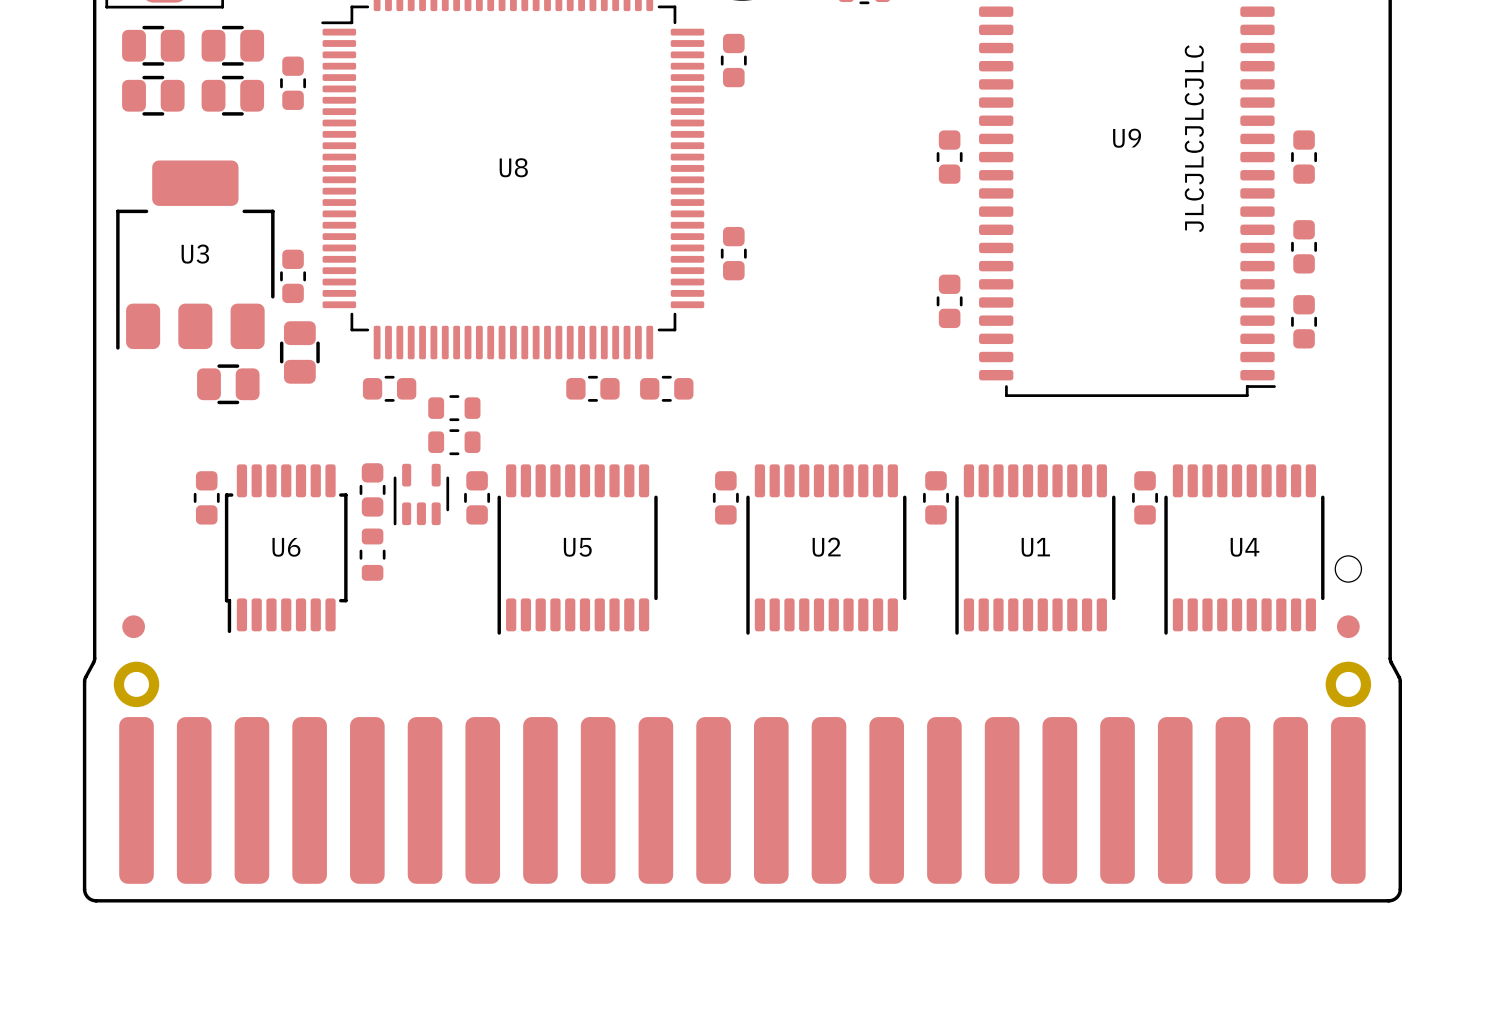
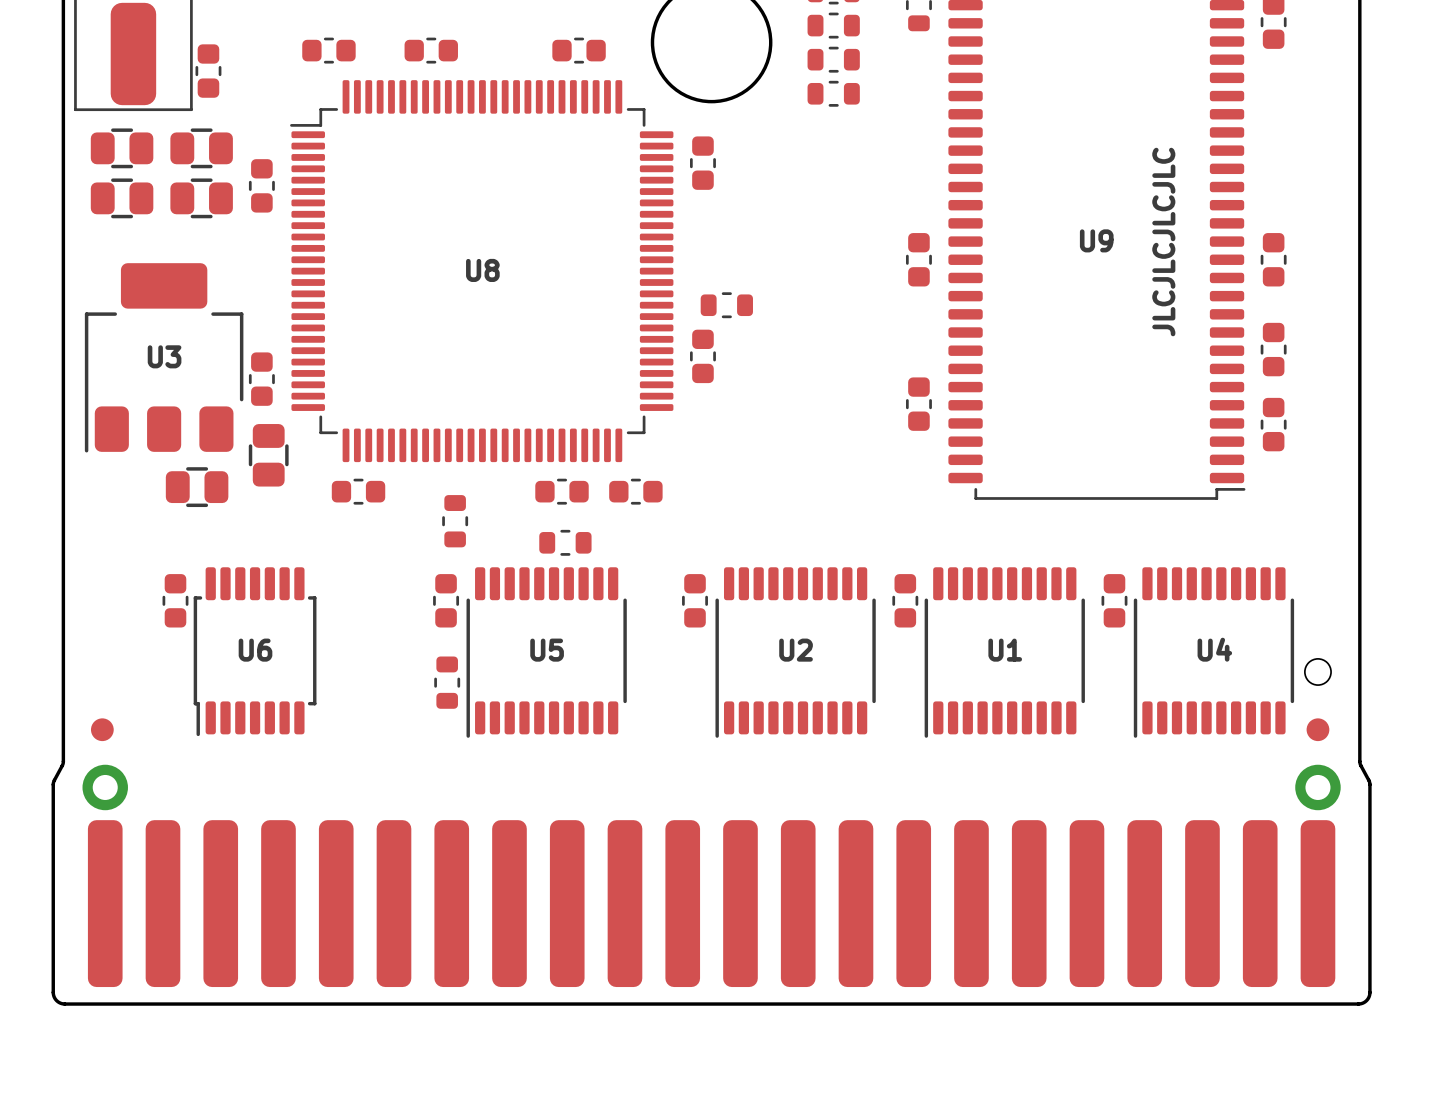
part: none -> (726, 305)
part: (454, 408) -> none
part: none -> (455, 521)
part: none -> (565, 542)
part: (454, 442) -> none
part: (372, 489) -> none
part: (421, 494) -> none
part: (372, 554) -> none
part: none -> (447, 682)

